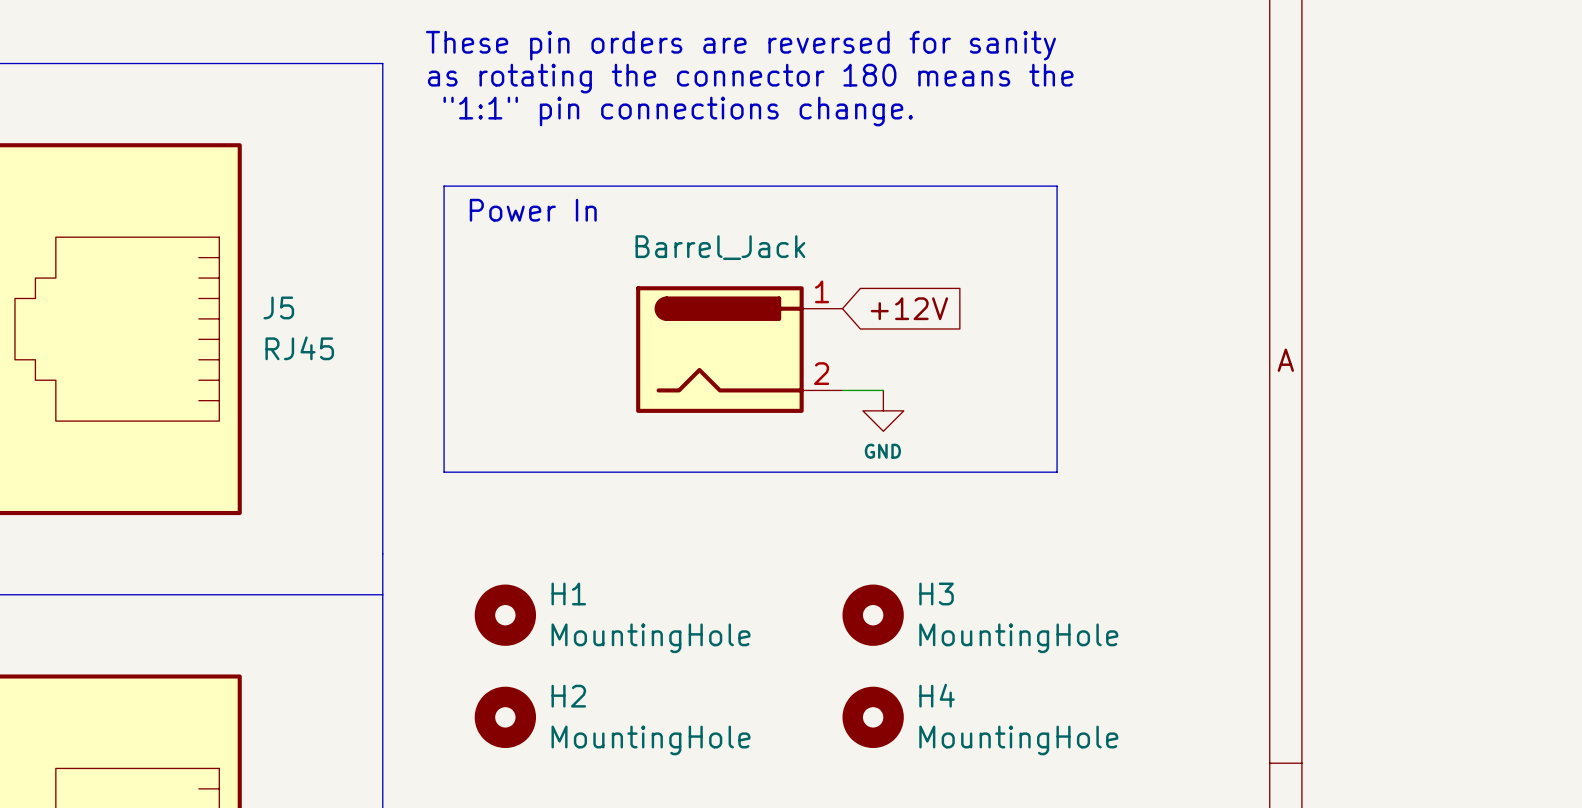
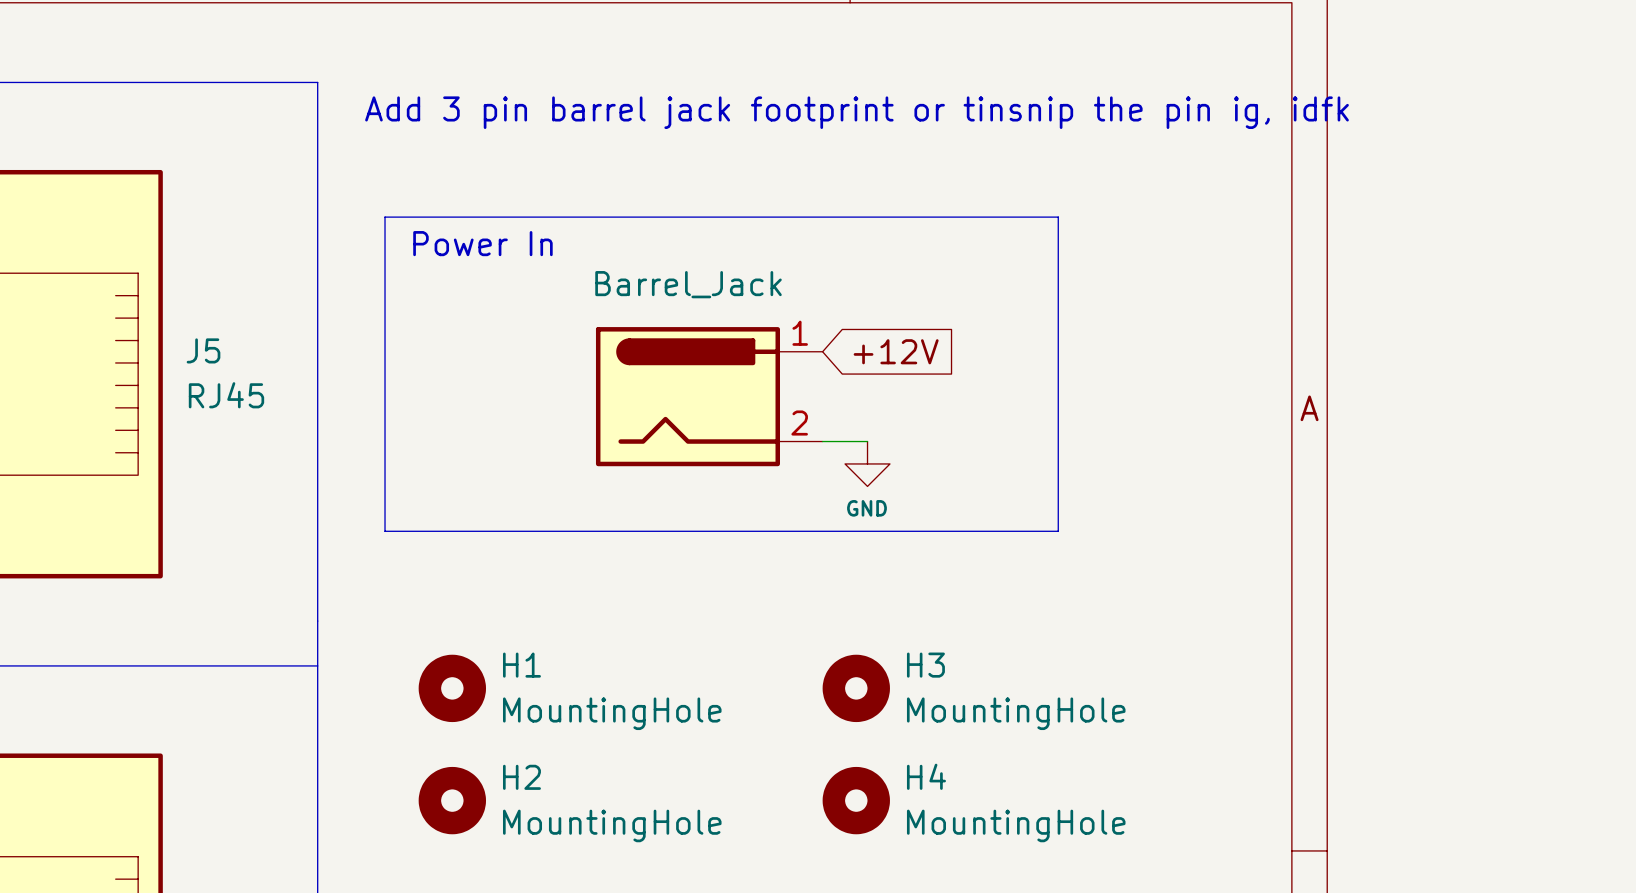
text: These pin orders are reversed for sanity (740, 45) -> none
text: as rotating the connector 180 means the (750, 78) -> none
text: none -> Add 3 pin barrel jack footprint or tinsnip the pin ig, idfk (857, 112)
text: "1:1" pin connections change. (678, 111) -> none

